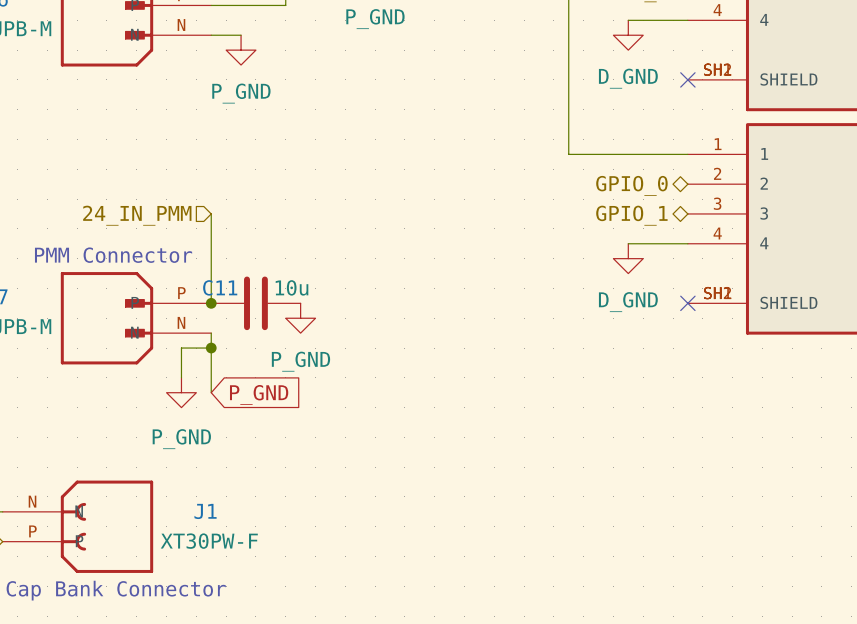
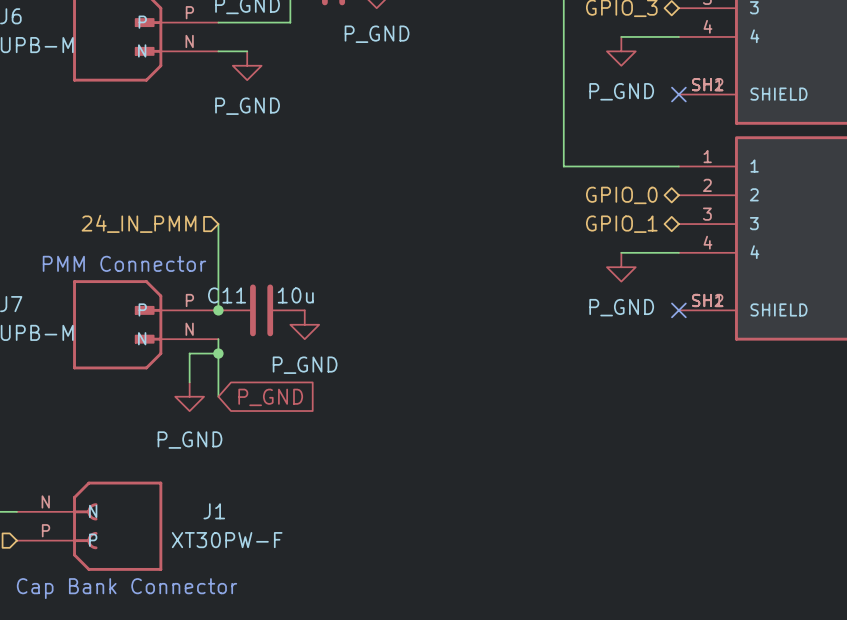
power symbol: D_GND (628, 35) -> P_GND (621, 51)
power symbol: D_GND (628, 258) -> P_GND (621, 267)

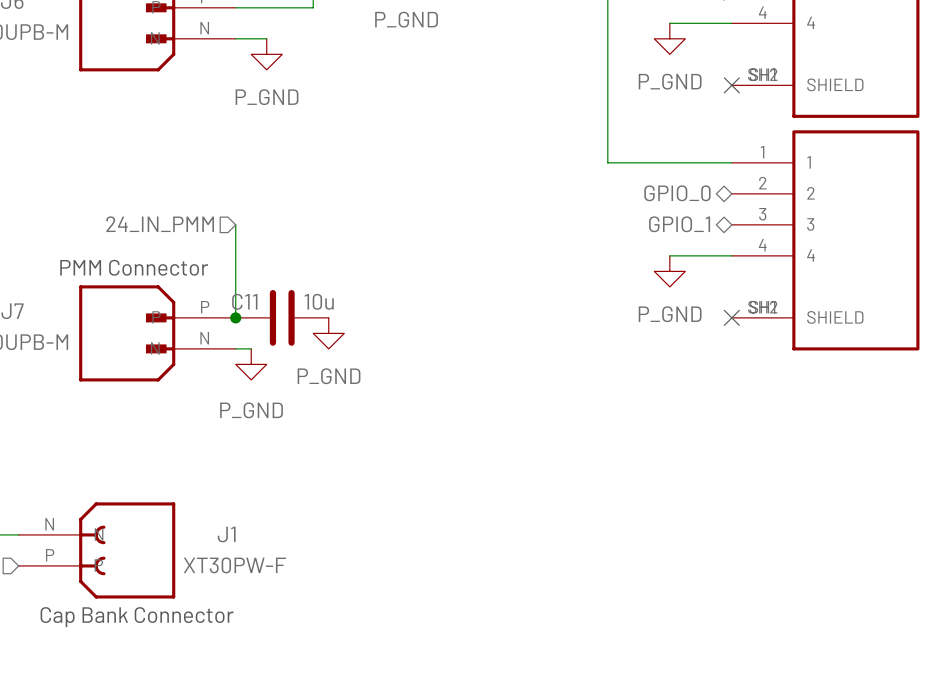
wire: (218, 339) (218, 396) -> (235, 348) (251, 348)
wire: (218, 353) (189, 353) (189, 382) -> none
junction: (218, 353) -> none
power symbol position: P_GND (189, 396) -> P_GND (251, 364)
global label: P_GND (270, 397) -> none

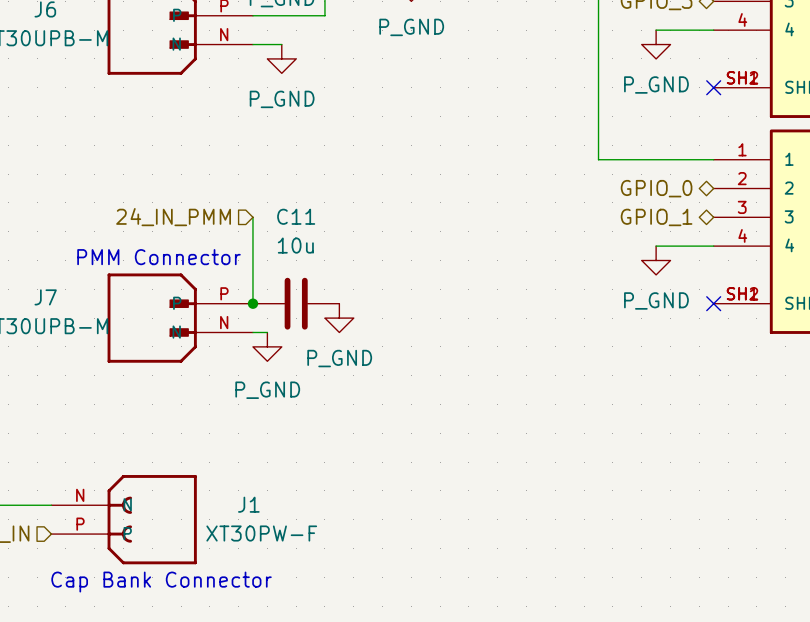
C11 name position: C11 (244, 301) -> C11 (296, 216)
C11 value position: 10u (319, 301) -> 10u (295, 245)

